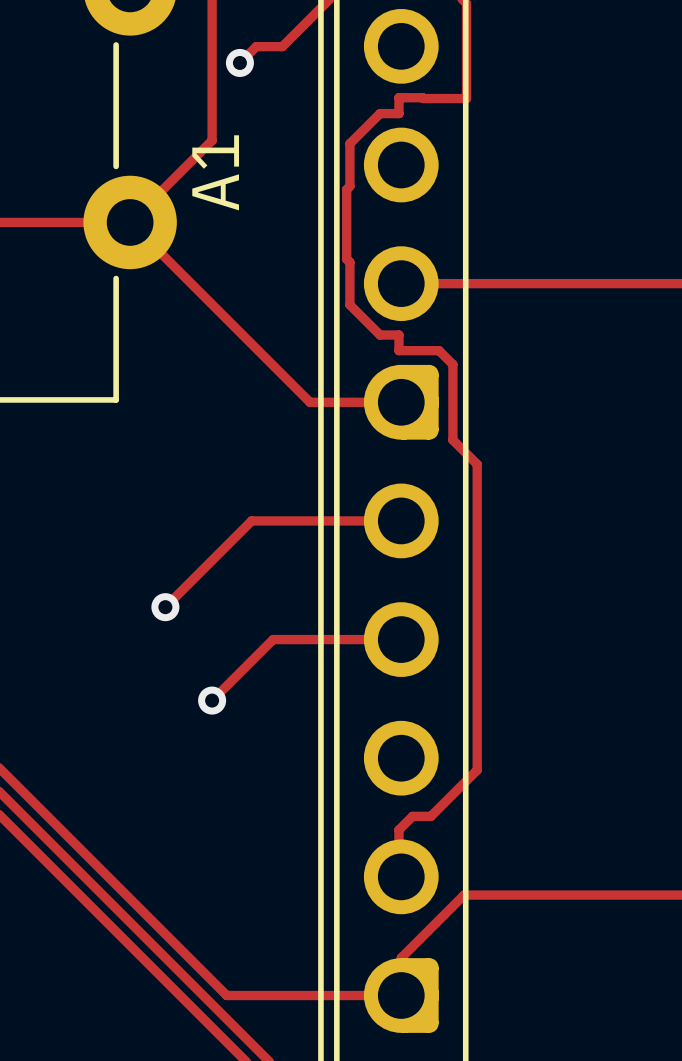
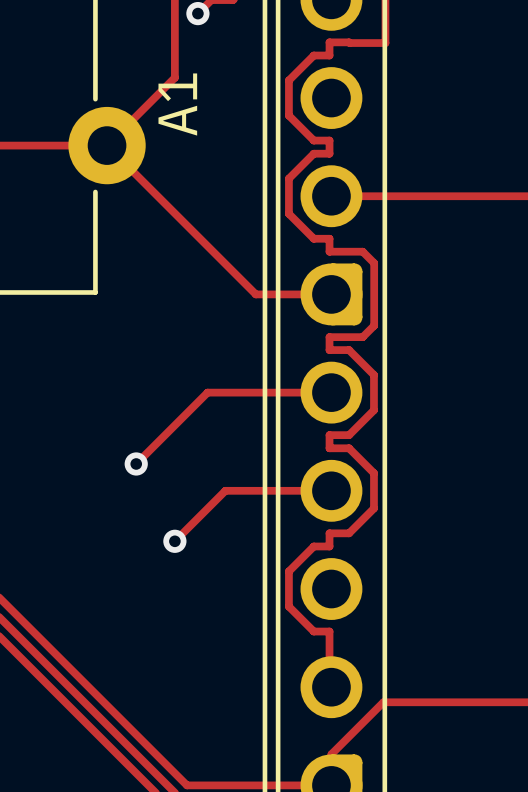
track: (349, 186) (346, 189) (346, 259) (349, 262) -> (288, 115) (313, 140) (329, 140) (329, 153) (313, 153) (288, 178)
track: (452, 440) (477, 464) (477, 770) (430, 816) (412, 816) (398, 829) -> (374, 325) (362, 337) (329, 337) (329, 350) (349, 350) (373, 375) (373, 410) (349, 435) (329, 435) (329, 448) (349, 448) (373, 473) (373, 508) (349, 533) (329, 533) (329, 546) (313, 546) (288, 571) (288, 606) (313, 631) (329, 631) (329, 648)

